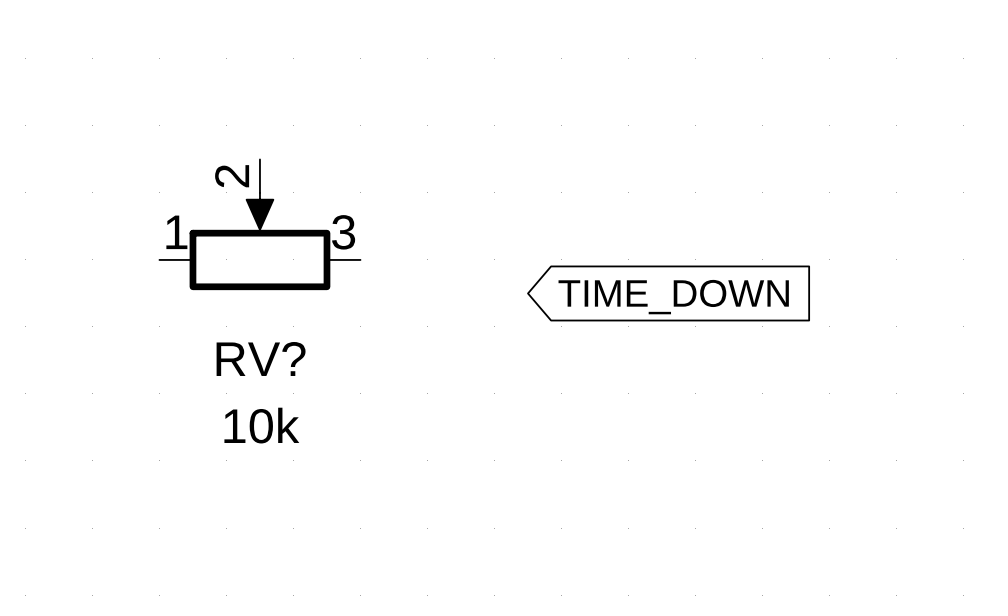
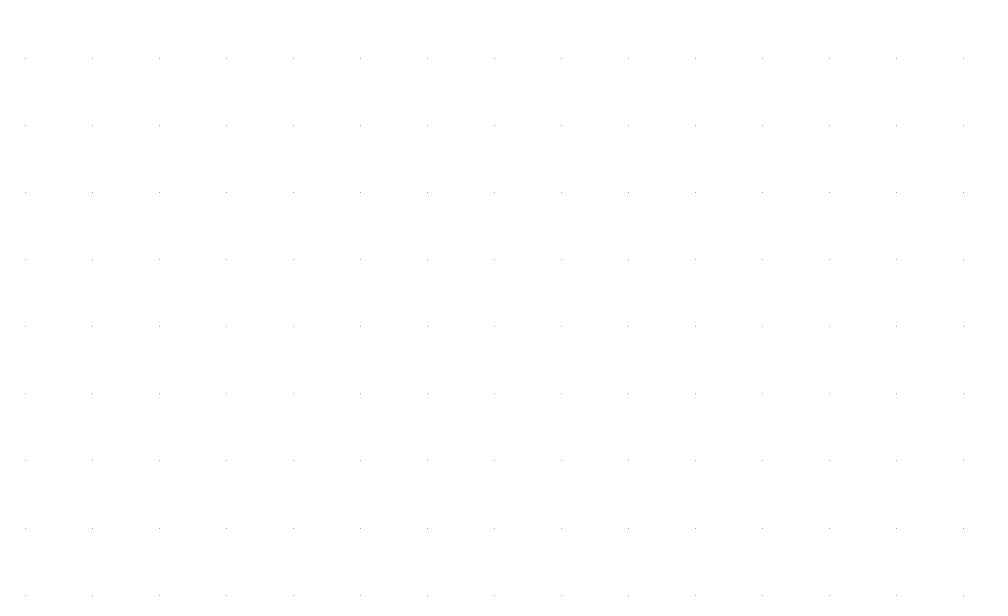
RV?: 10k (259, 224) -> none
global label: TIME_DOWN (673, 297) -> none

